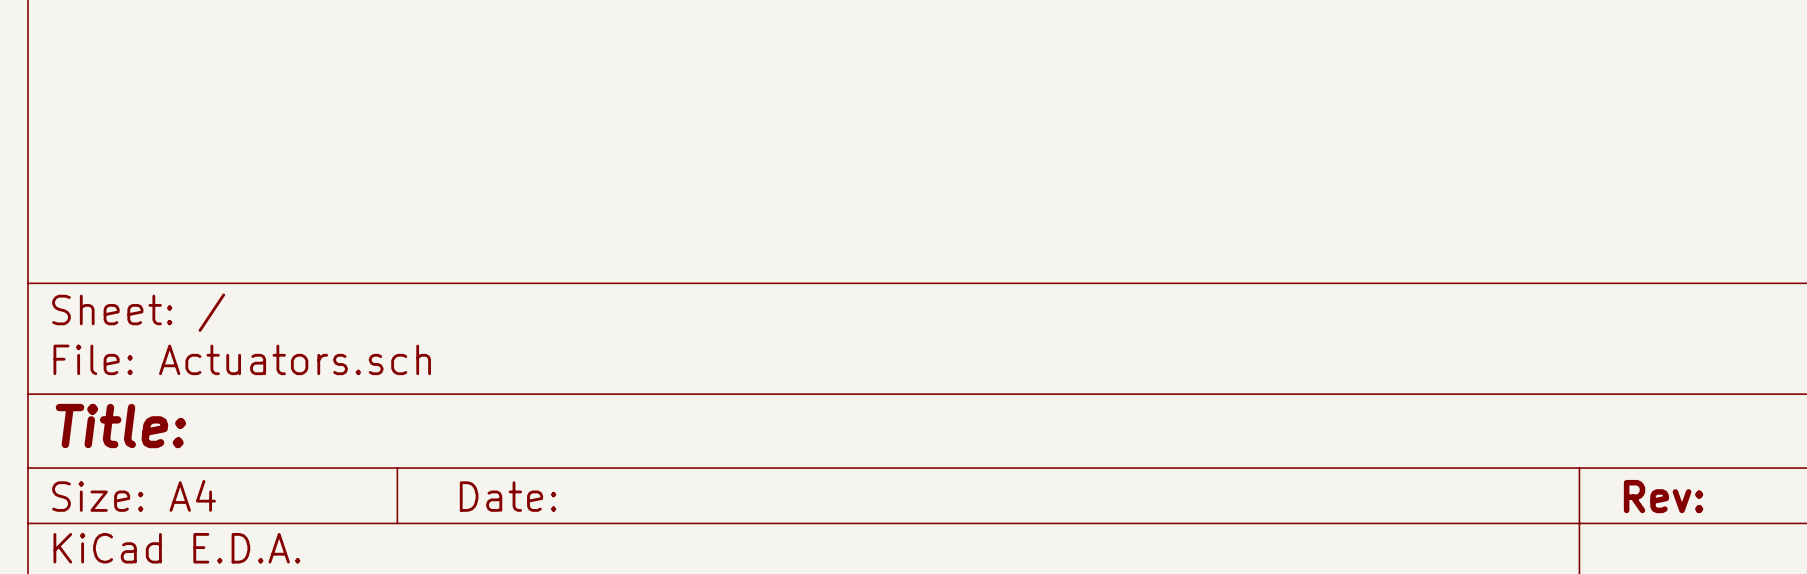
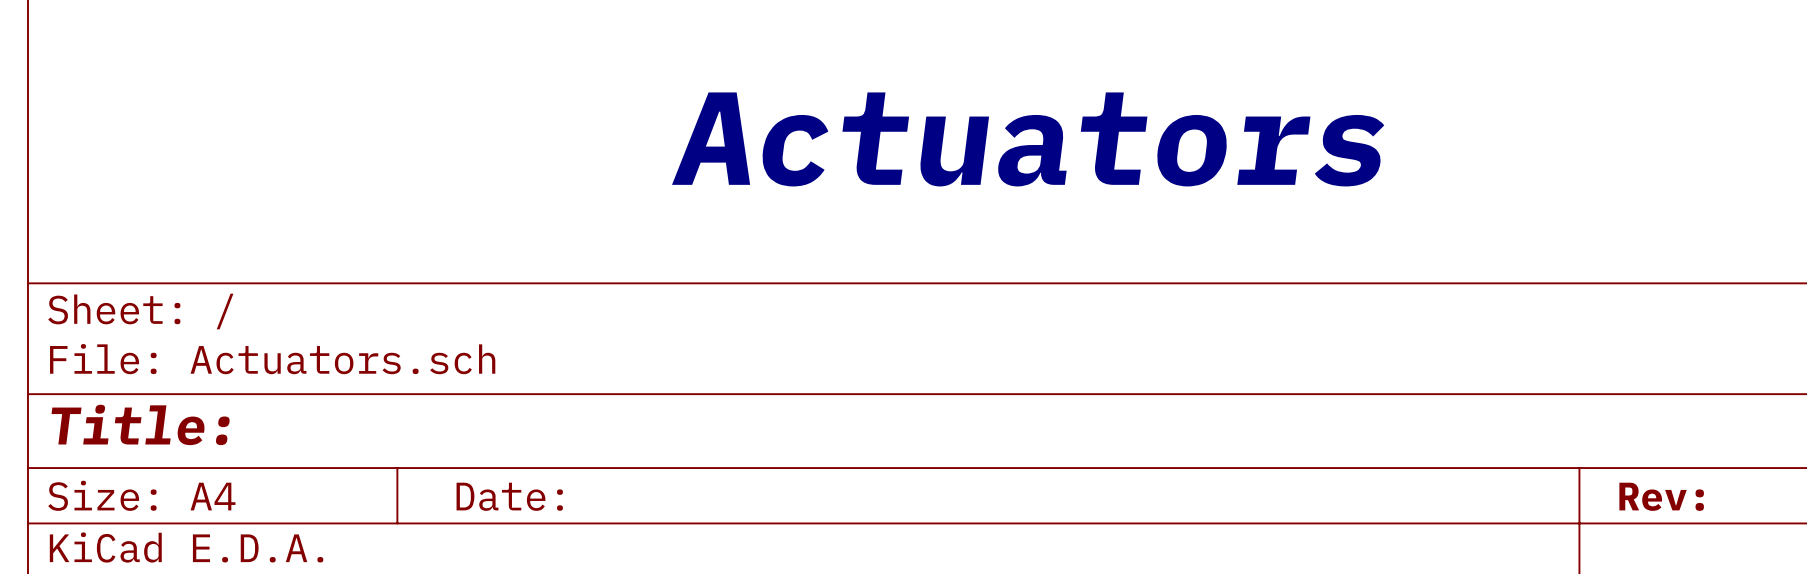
text: none -> Actuators (1028, 139)

